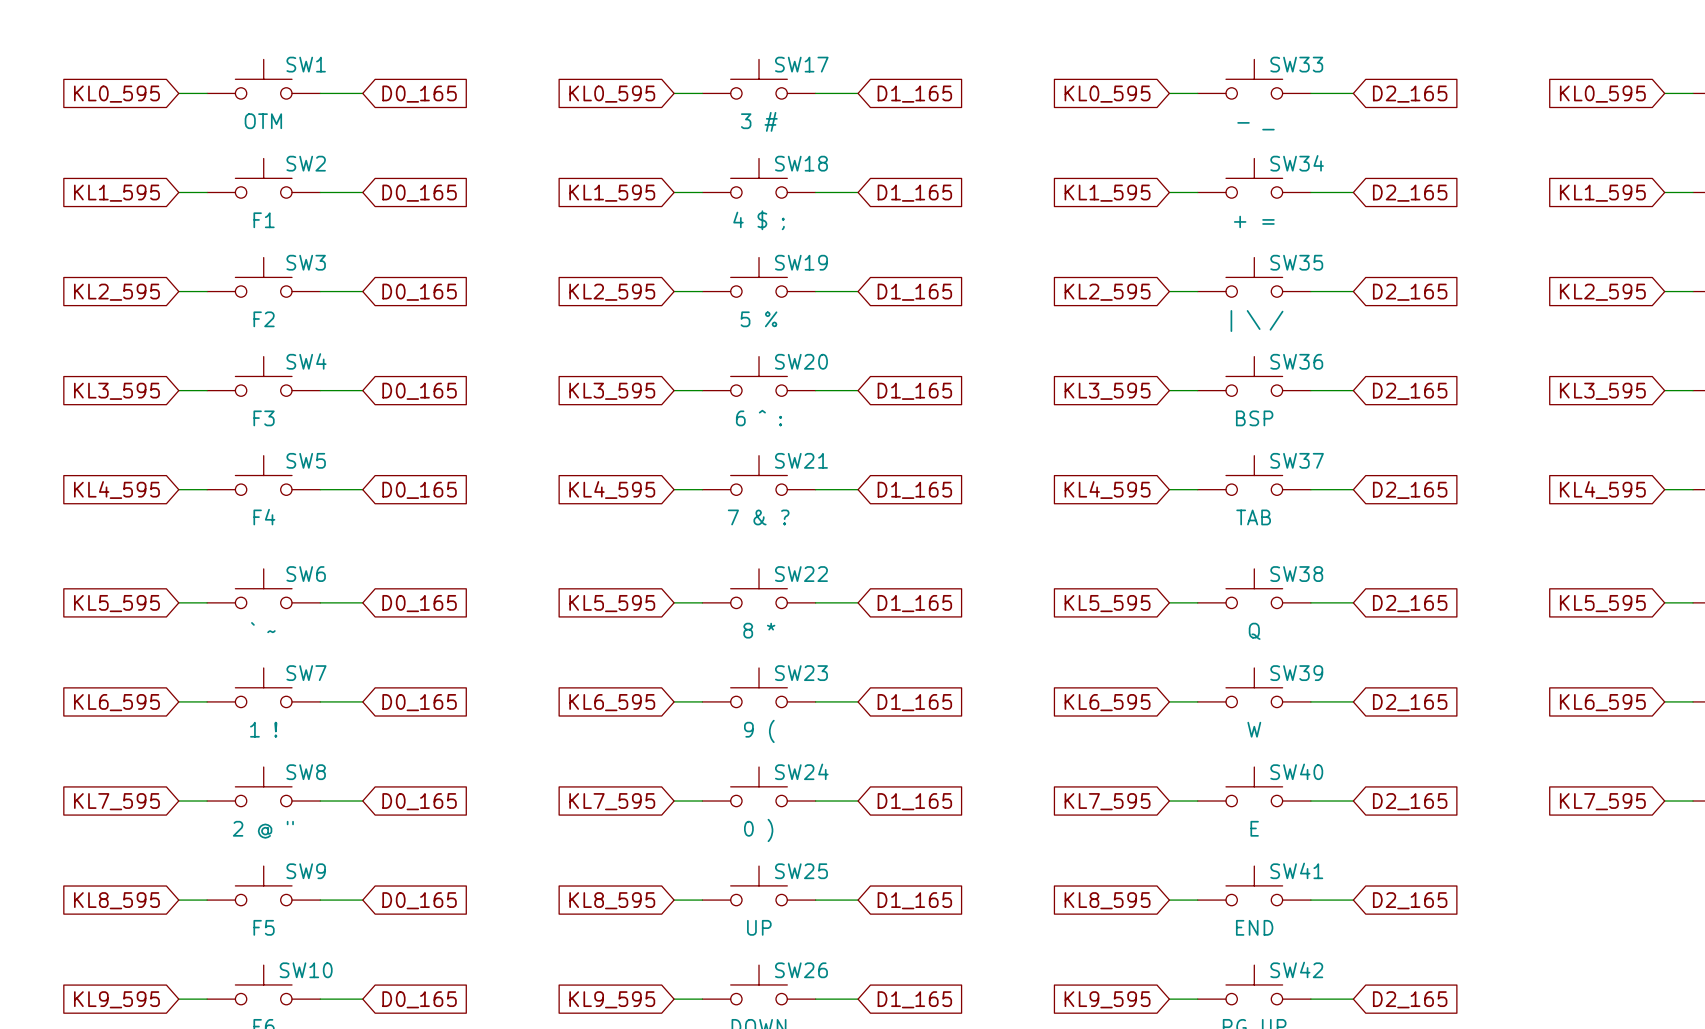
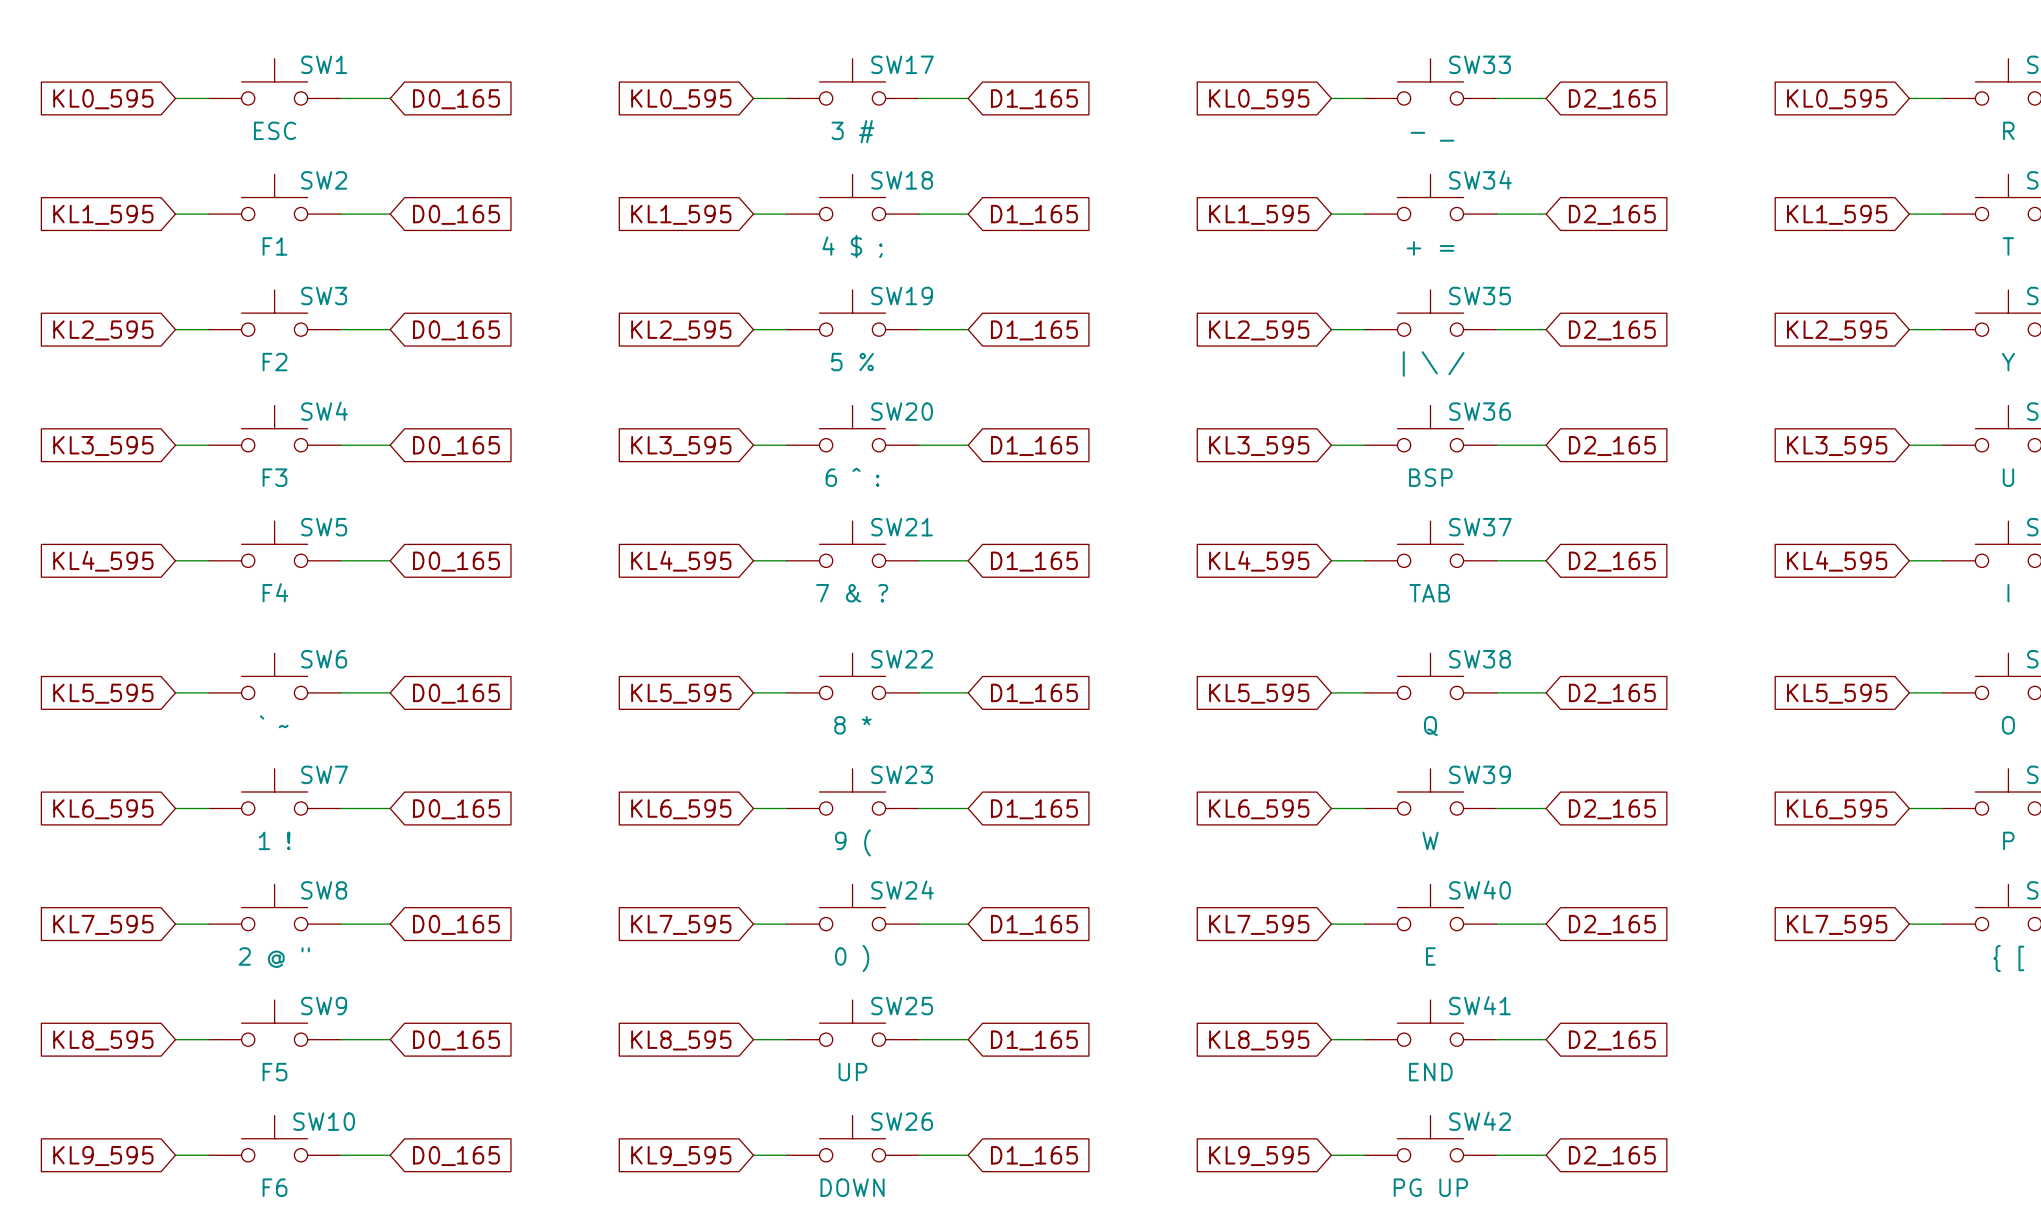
SW1 value: ОТМ (263, 121) -> ESC (275, 130)

